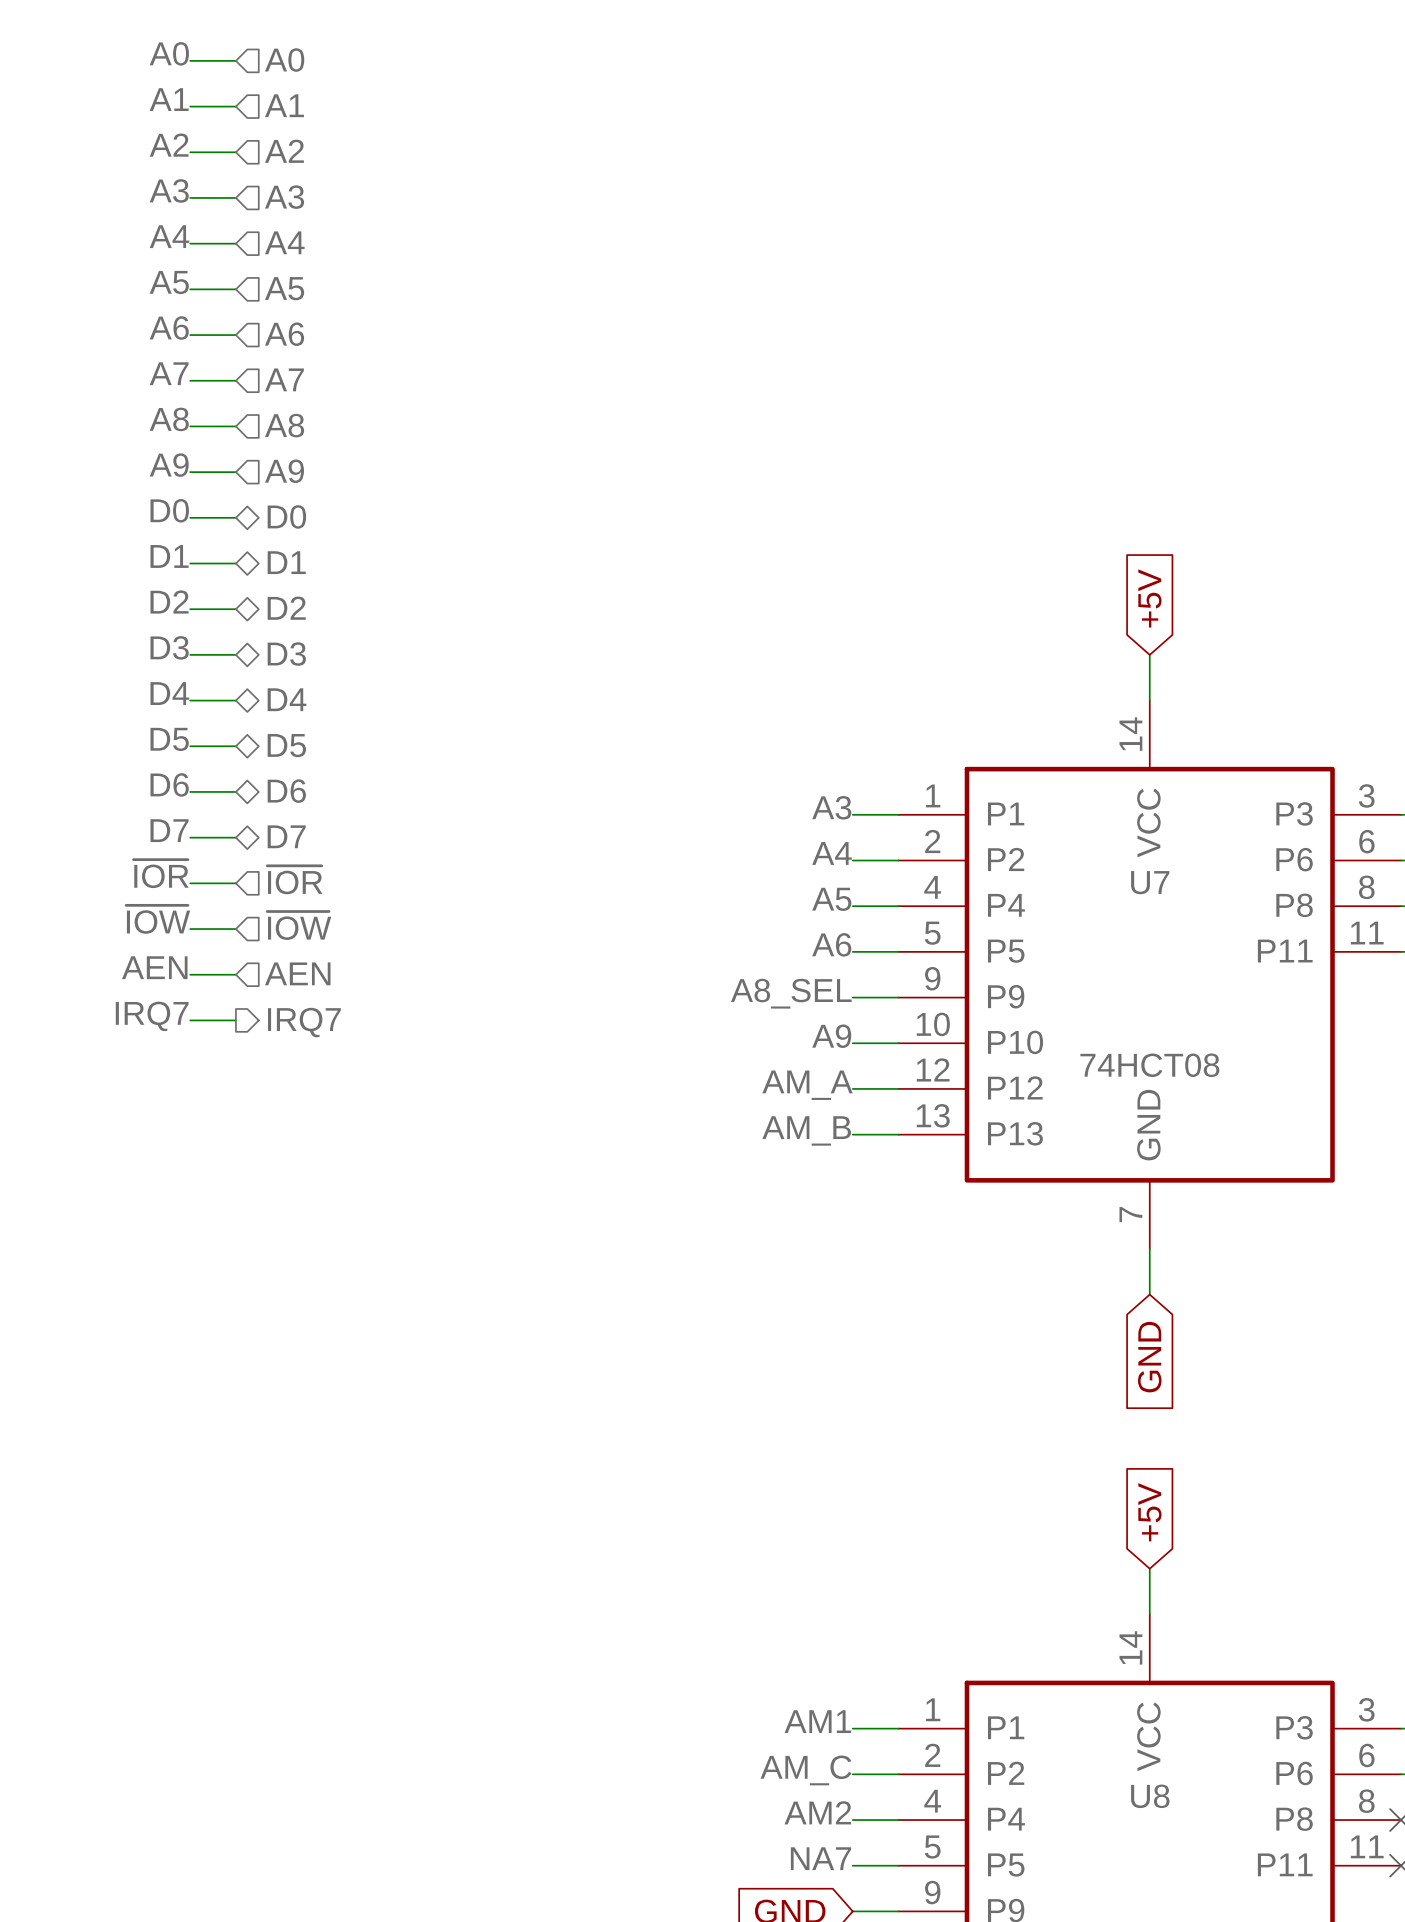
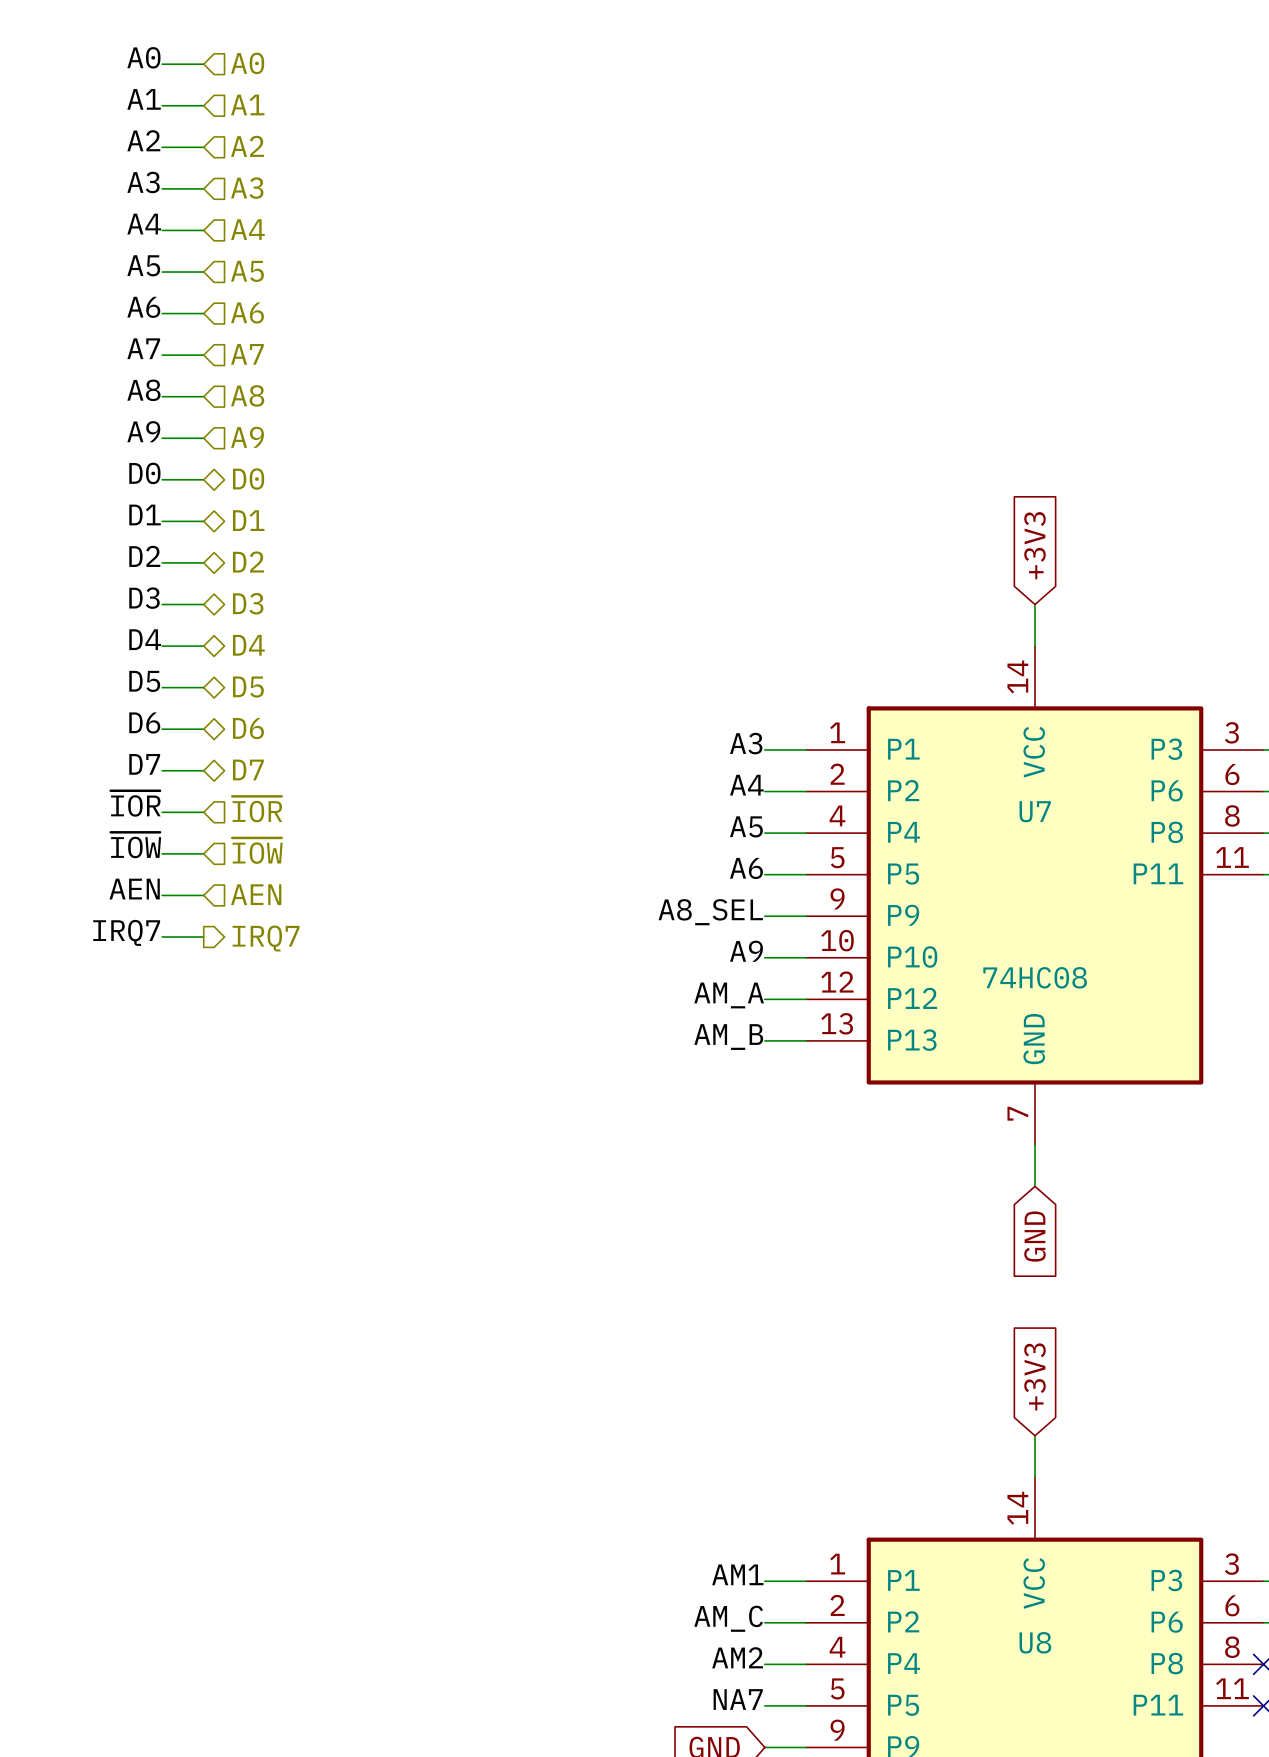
global label: +5V (1149, 598) -> +3V3 (1034, 545)
U7 value: 74HCT08 (1149, 1065) -> 74HC08 (1035, 977)
global label: +5V (1149, 1512) -> +3V3 (1034, 1376)

